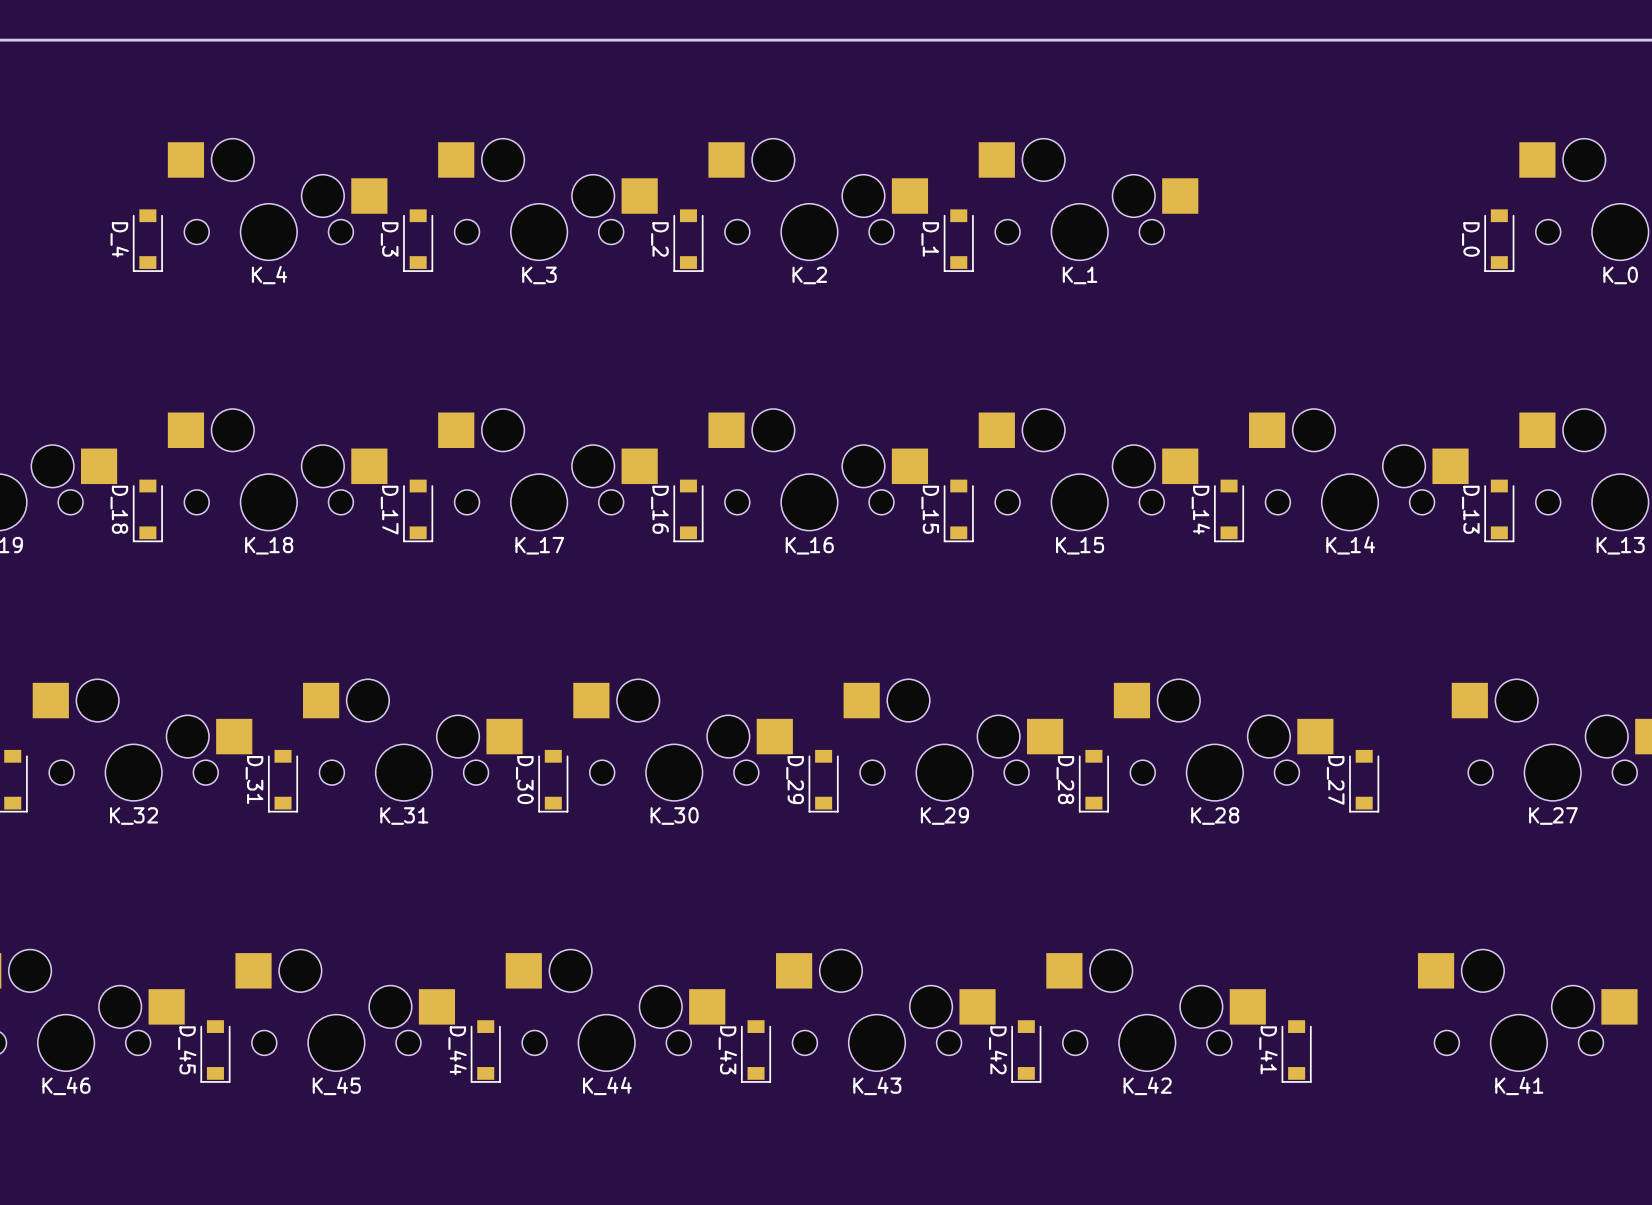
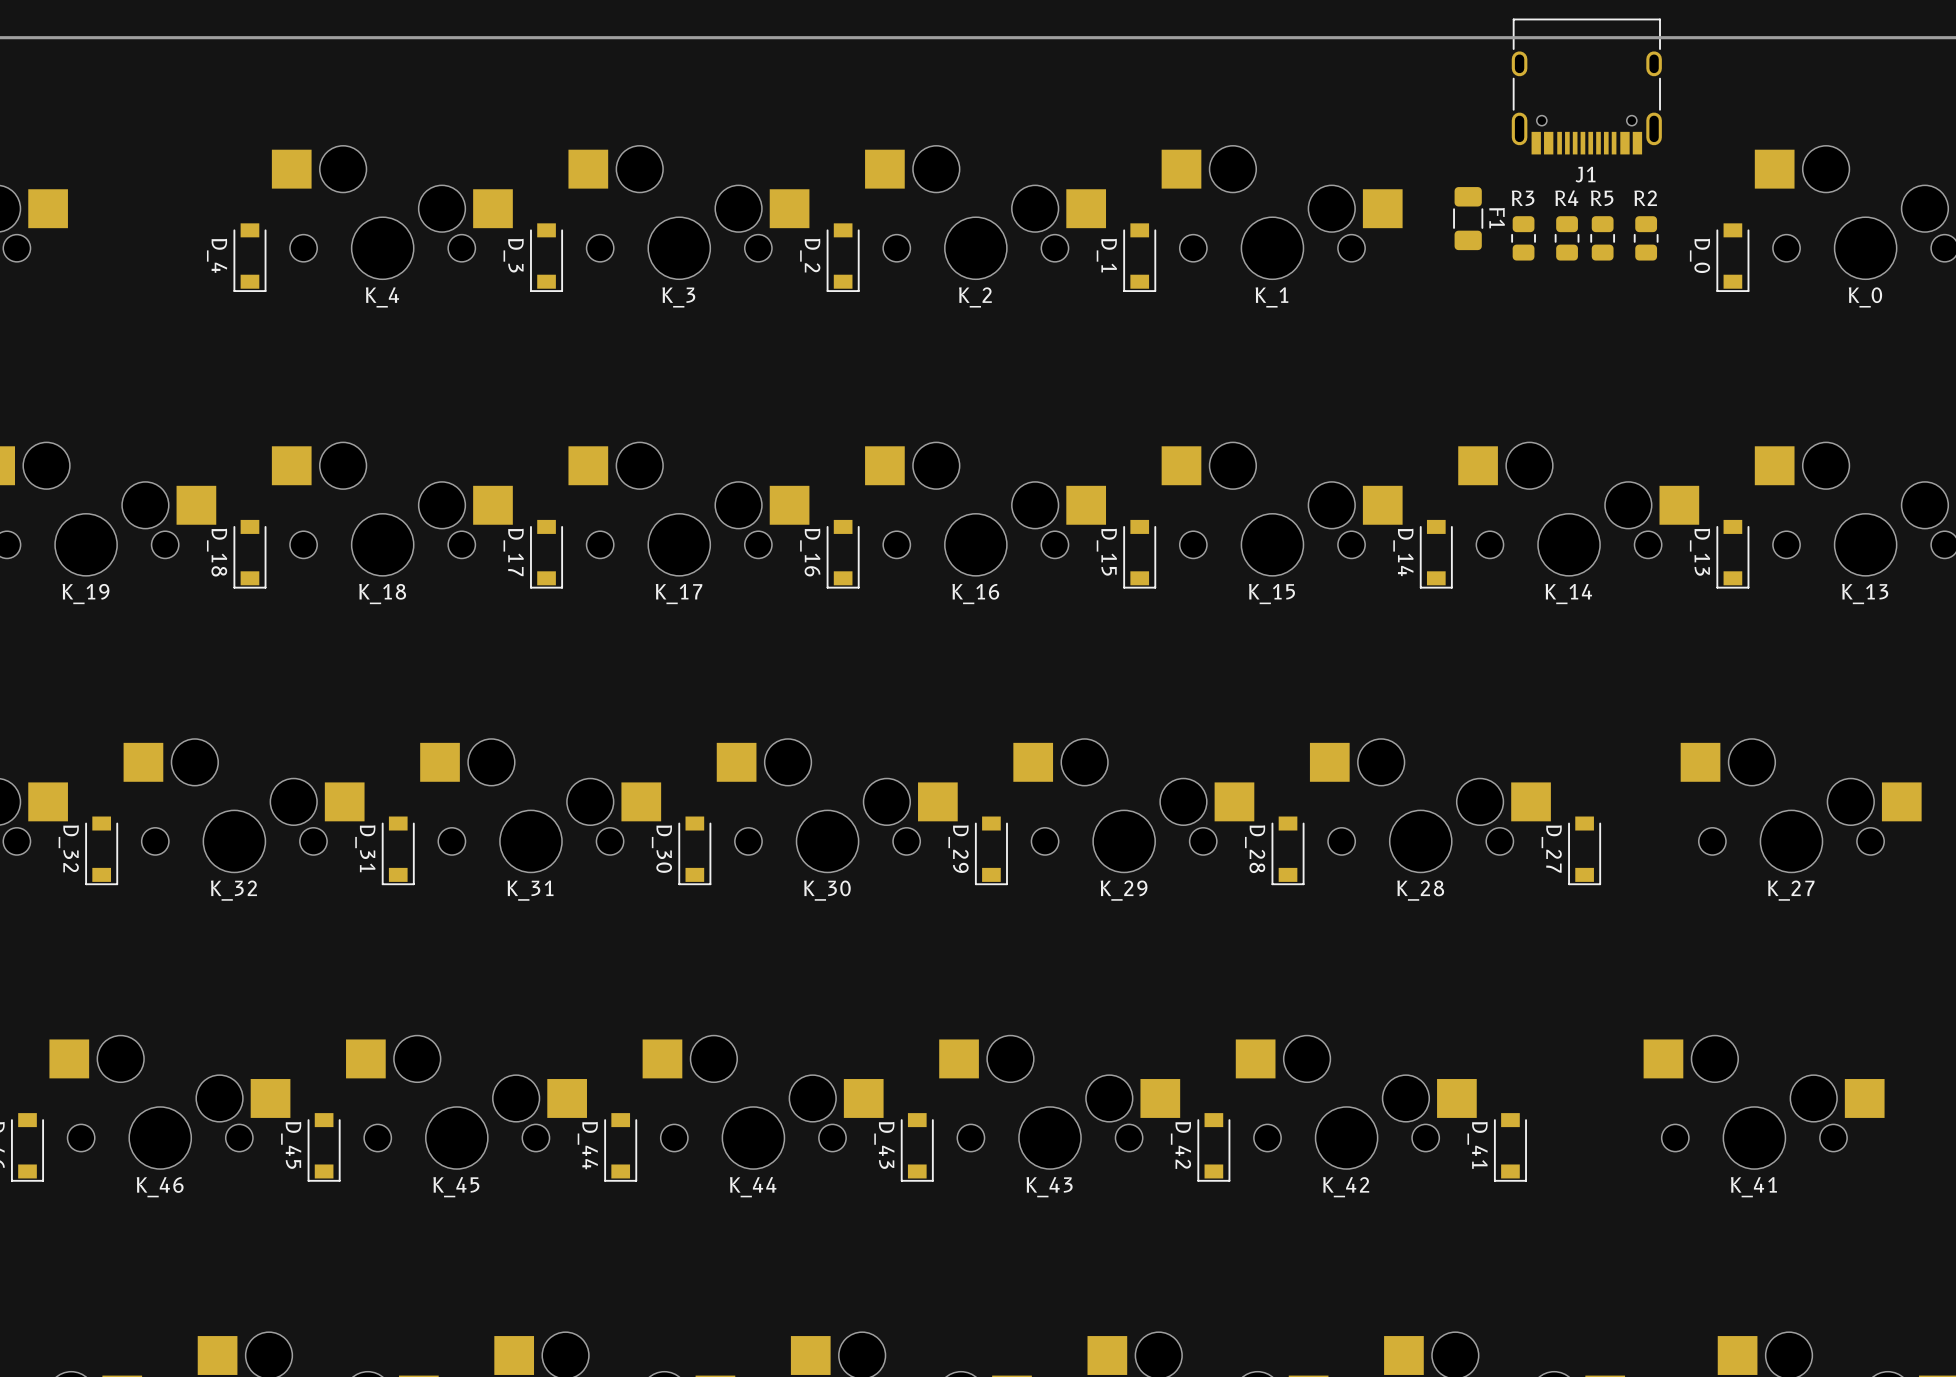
J1: none -> (1586, 86)
F1: none -> (1468, 218)
R3: none -> (1523, 238)
R4: none -> (1567, 238)
R5: none -> (1602, 238)
R2: none -> (1646, 238)

